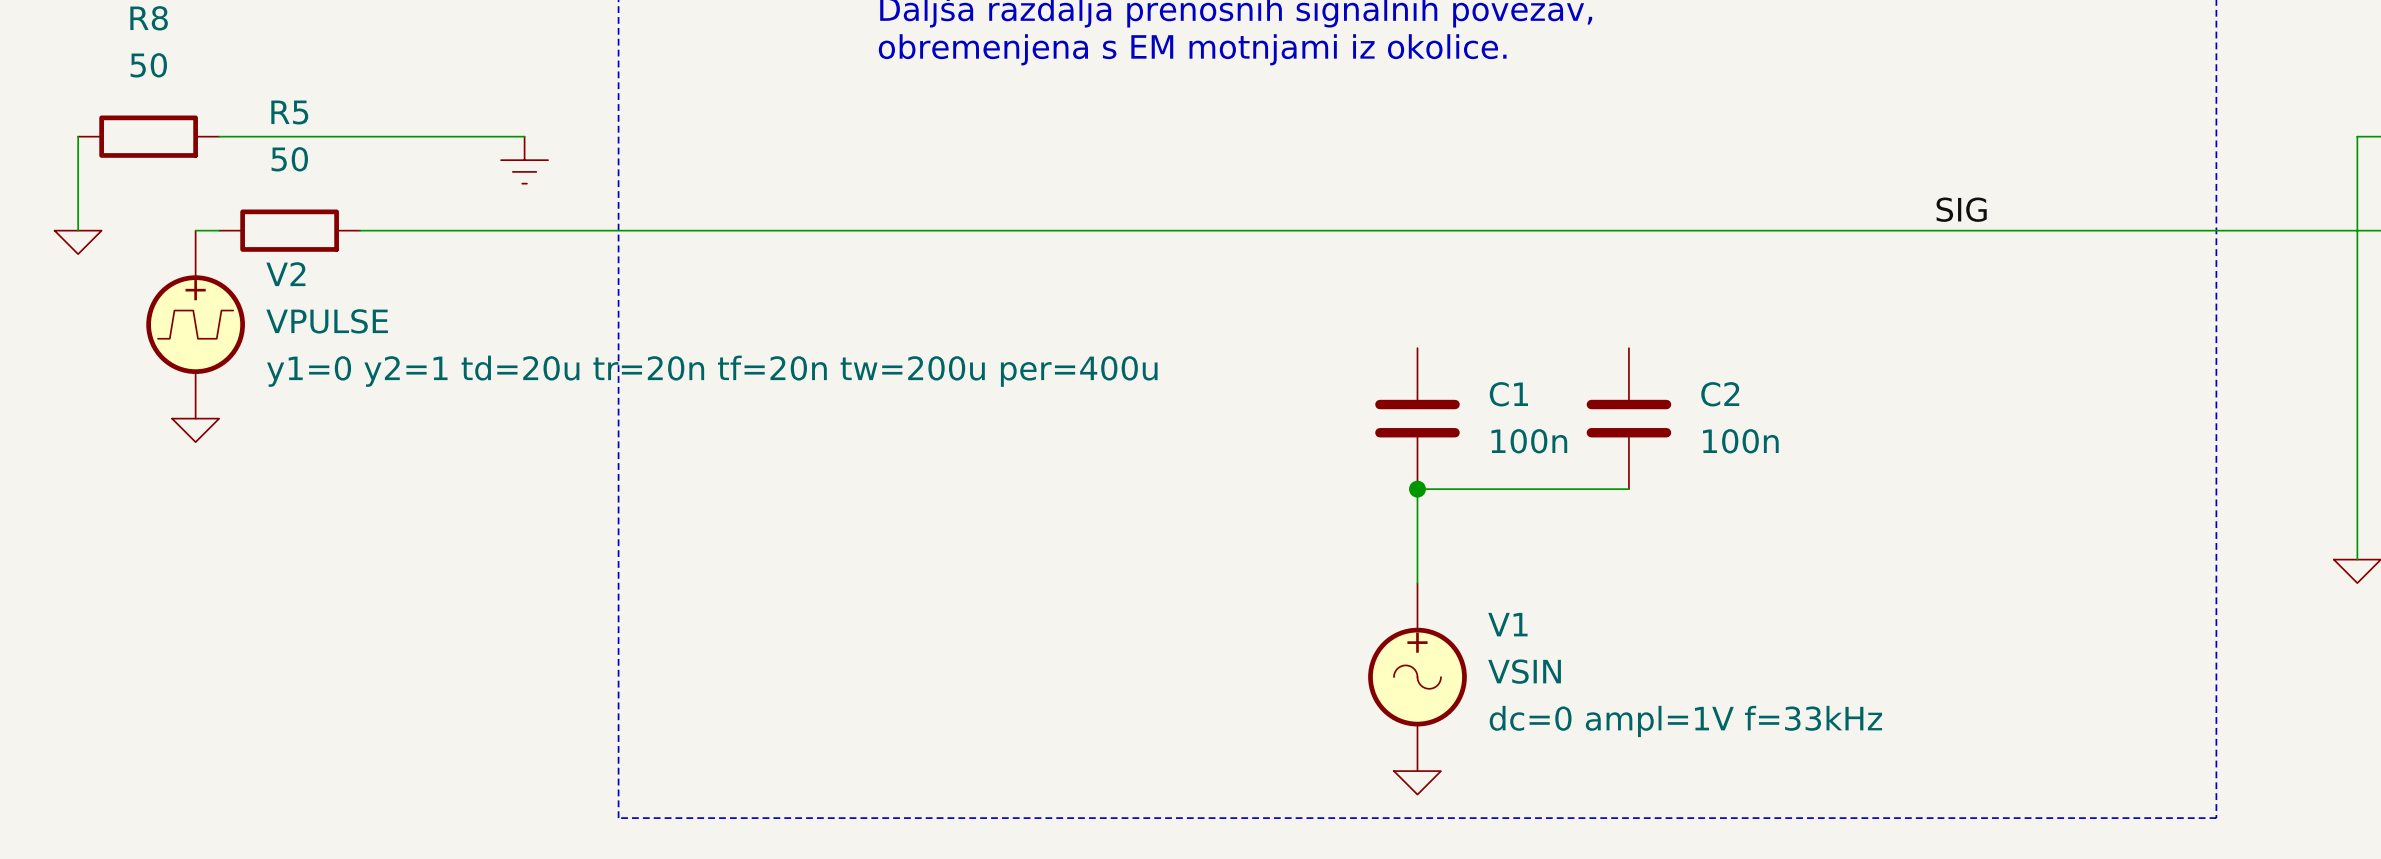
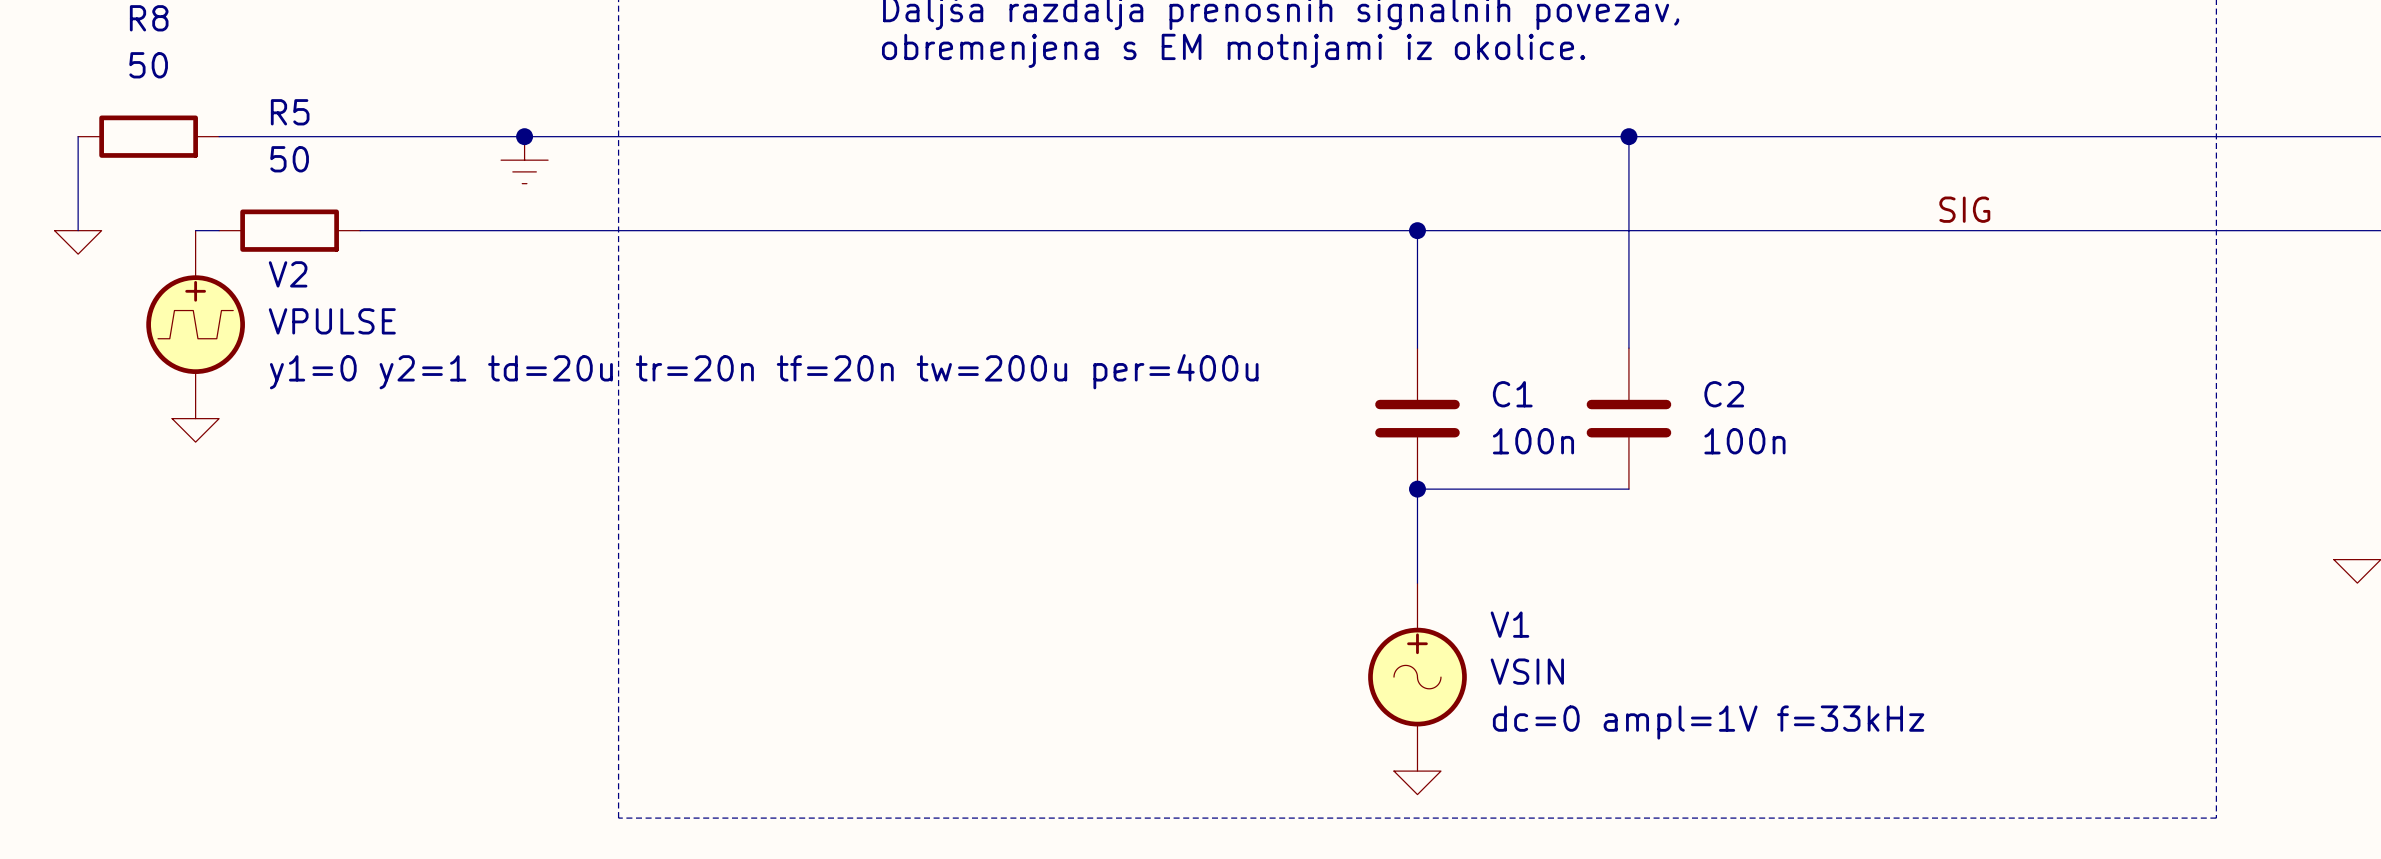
junction: none -> (524, 136)
wire: none -> (1628, 136) (1628, 348)
junction: none -> (1628, 136)
wire: (2357, 136) (2357, 559) -> (2357, 136) (524, 136)
wire: none -> (1417, 230) (1417, 348)
junction: none -> (1417, 230)

